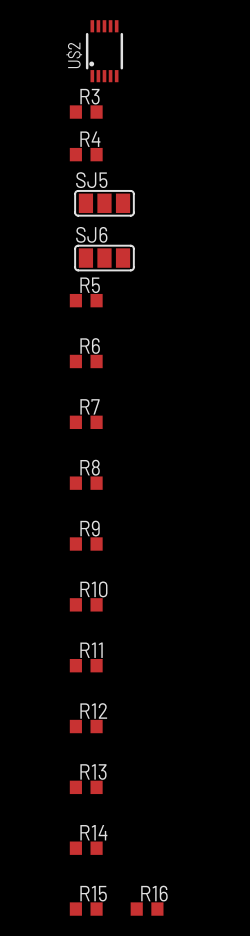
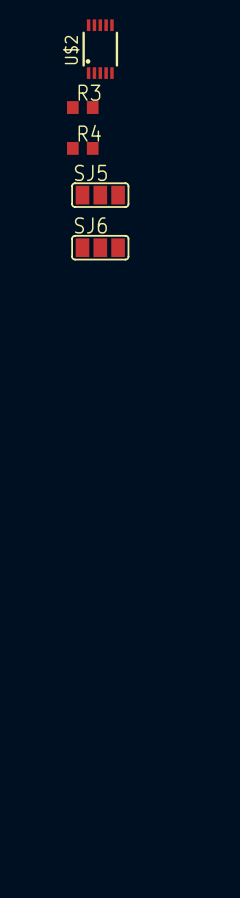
R5: (86, 300) -> none
R6: (86, 361) -> none
R7: (86, 422) -> none
R8: (86, 483) -> none
R9: (86, 544) -> none
R10: (86, 604) -> none
R11: (86, 665) -> none
R12: (86, 726) -> none
R13: (86, 787) -> none
R14: (86, 848) -> none
R15: (86, 909) -> none
R16: (147, 909) -> none

